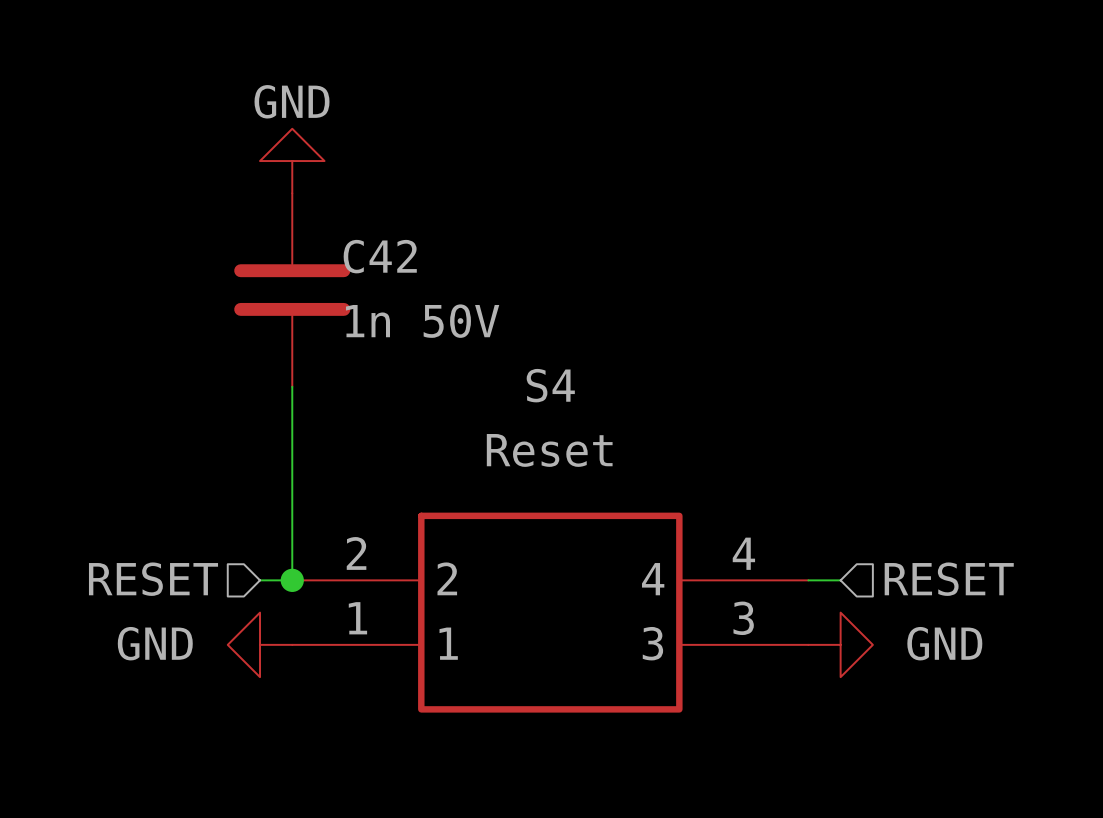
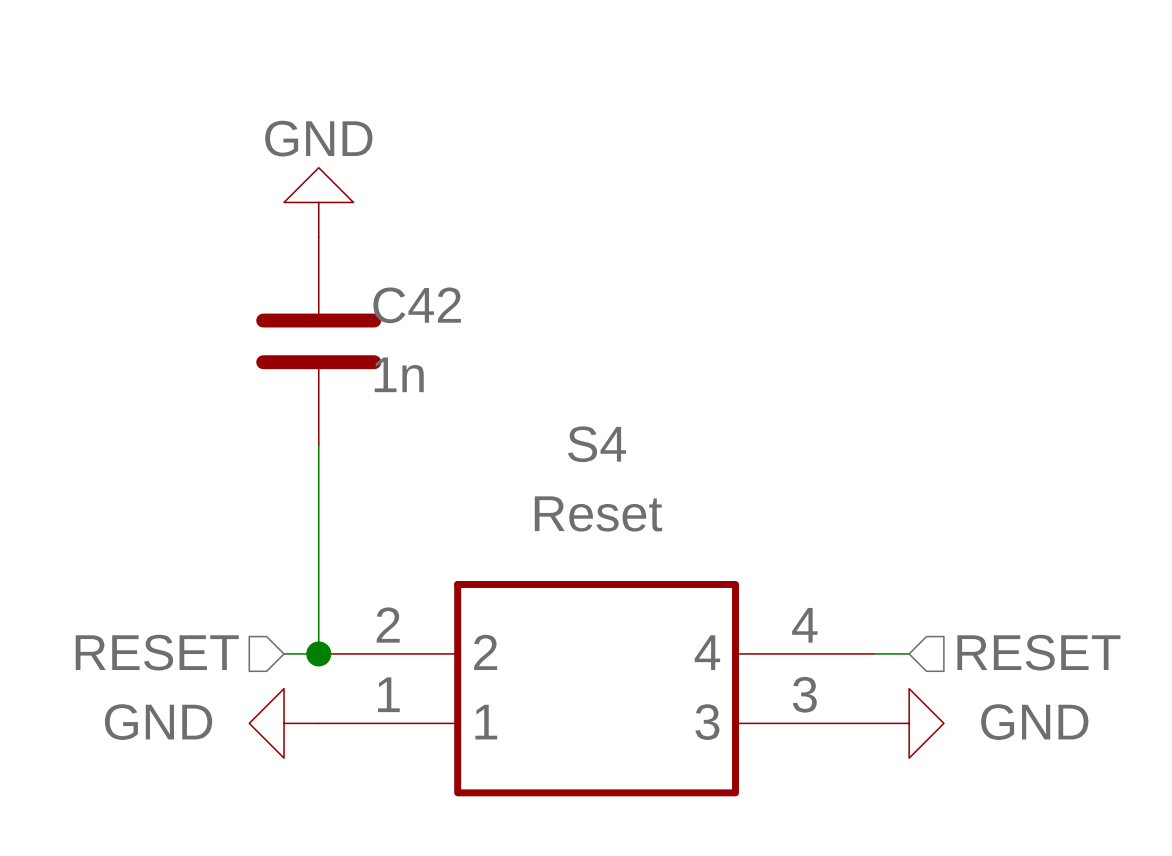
C42 value: 1n 50V (422, 321) -> 1n (399, 374)

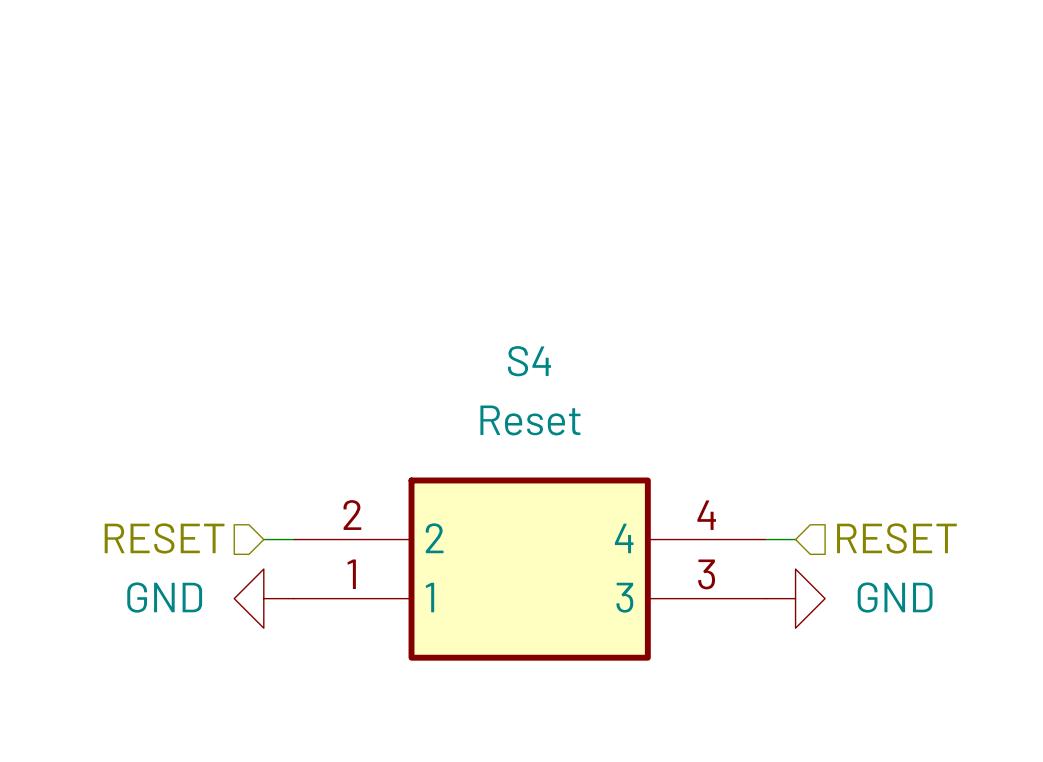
power symbol: GND (318, 202) -> none
C42: 1n (318, 341) -> none
wire: (318, 445) (318, 653) -> none
junction: (318, 653) -> none

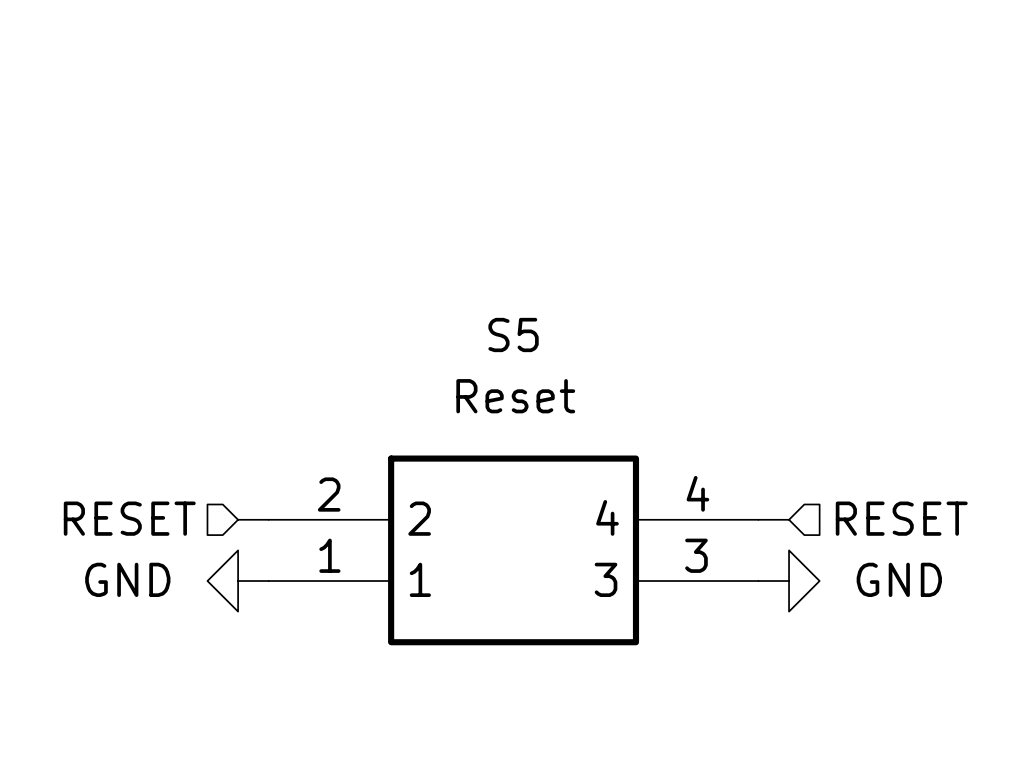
S4 name: S4 (529, 361) -> S5 (513, 335)

